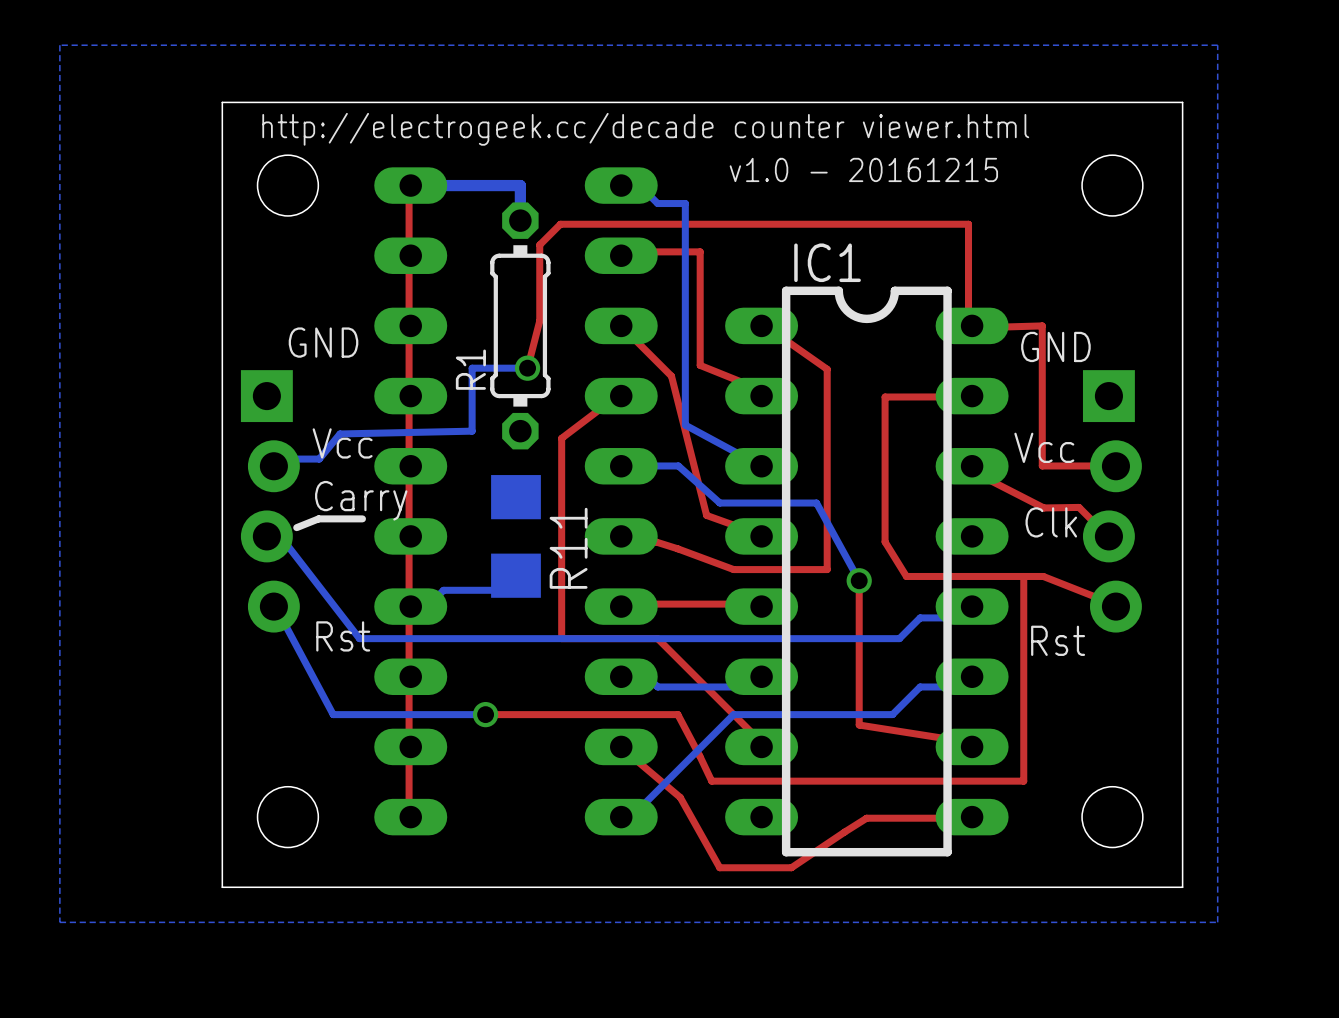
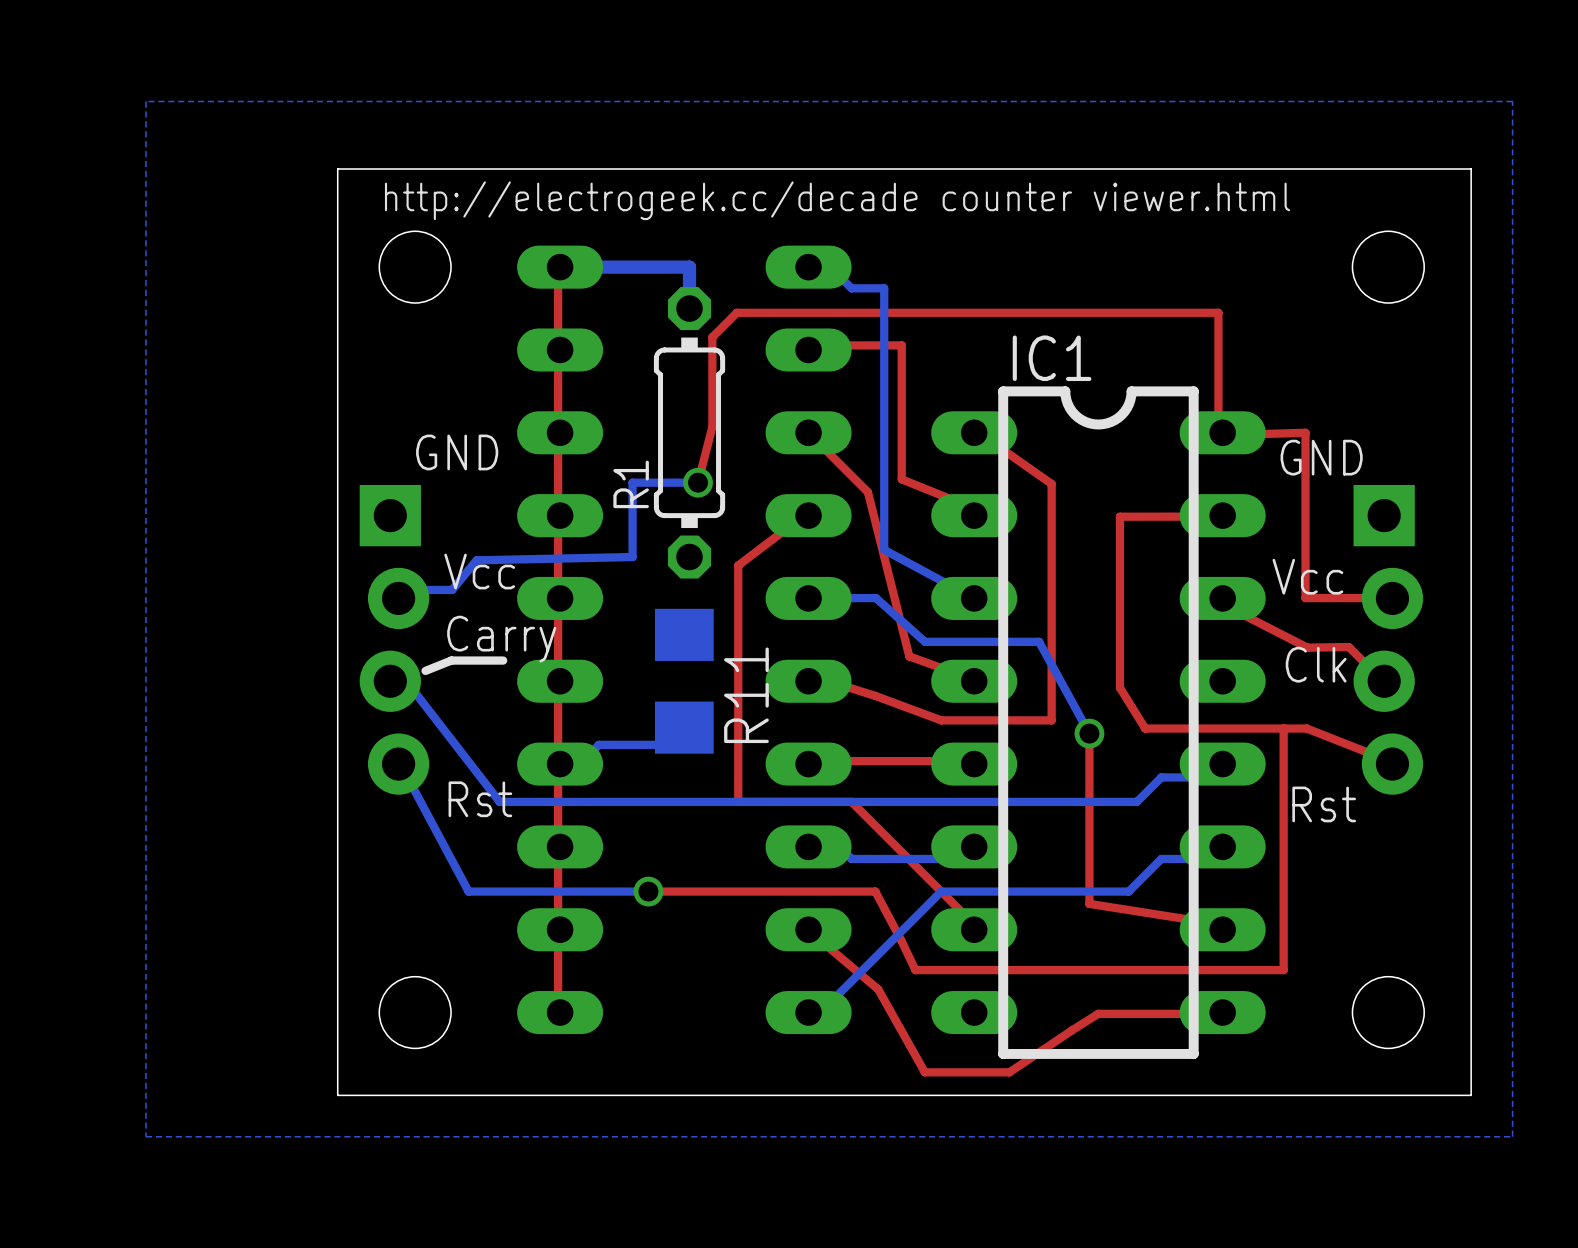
text: v1.0 - 20161215 (863, 169) -> none

